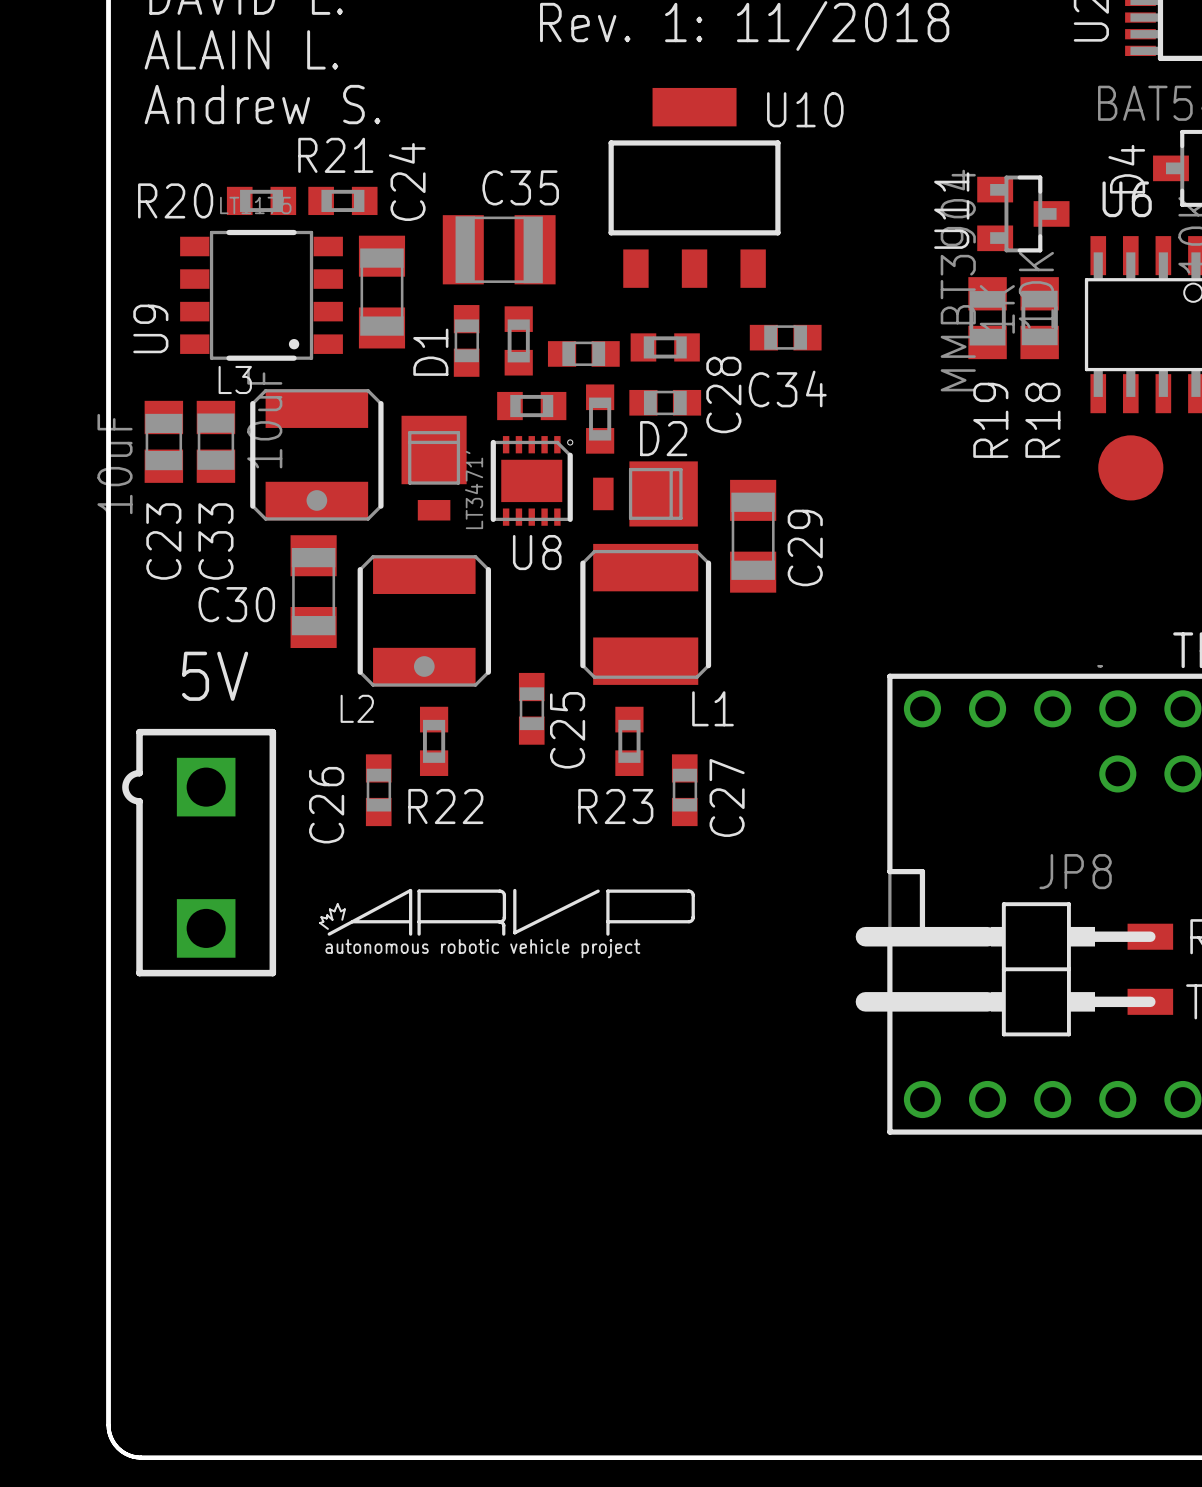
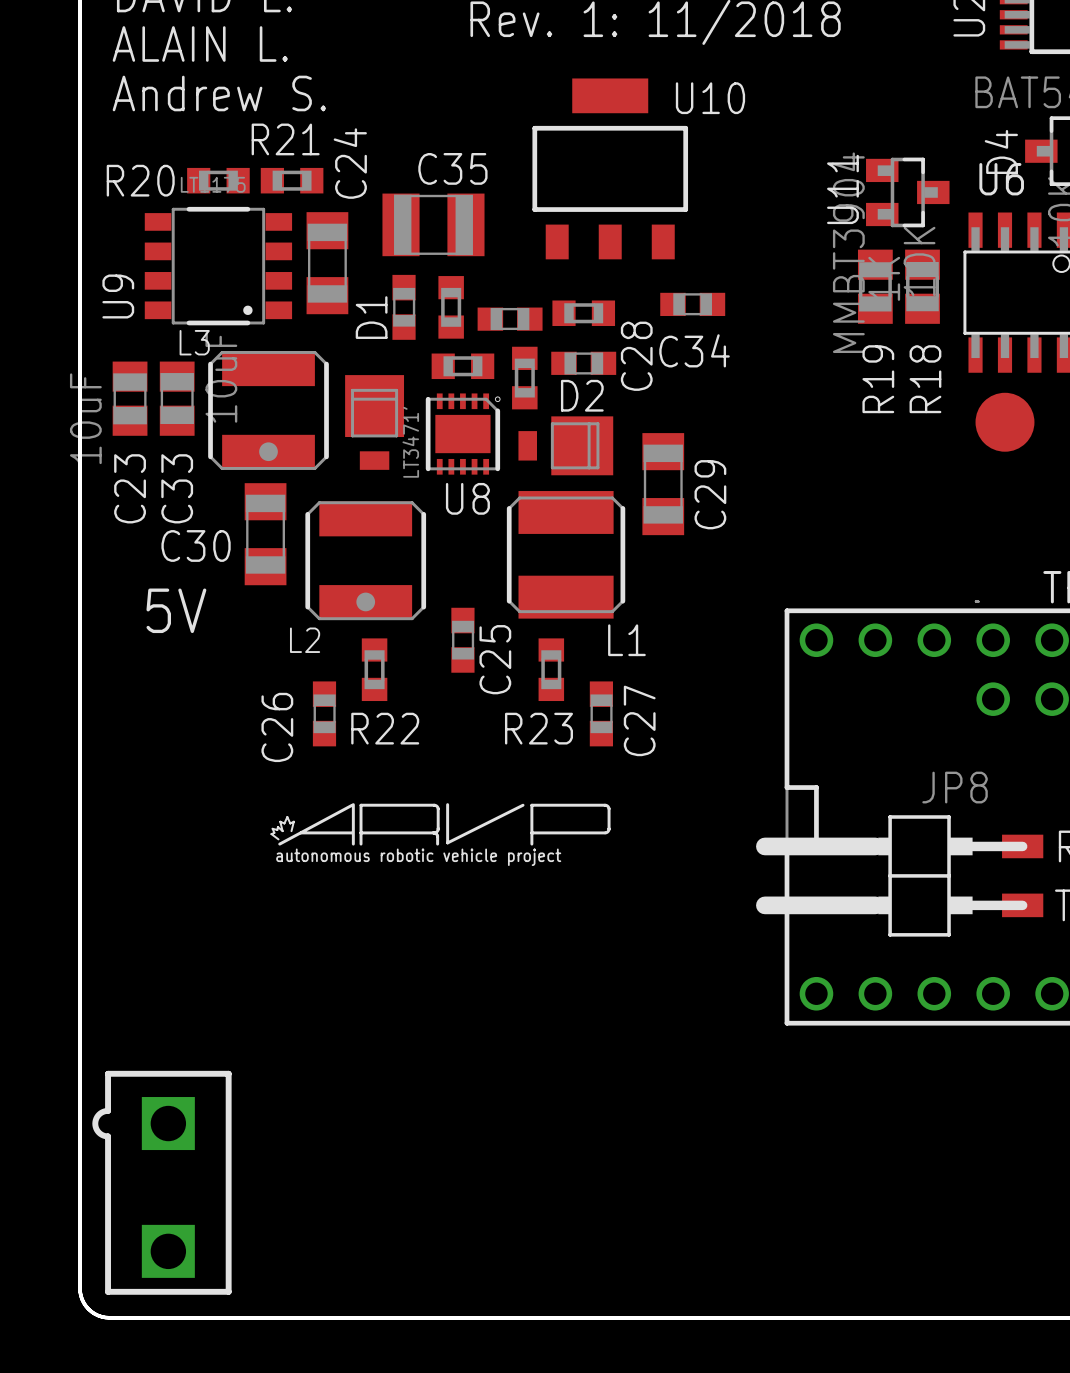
part position: (199, 852) -> (161, 1182)

